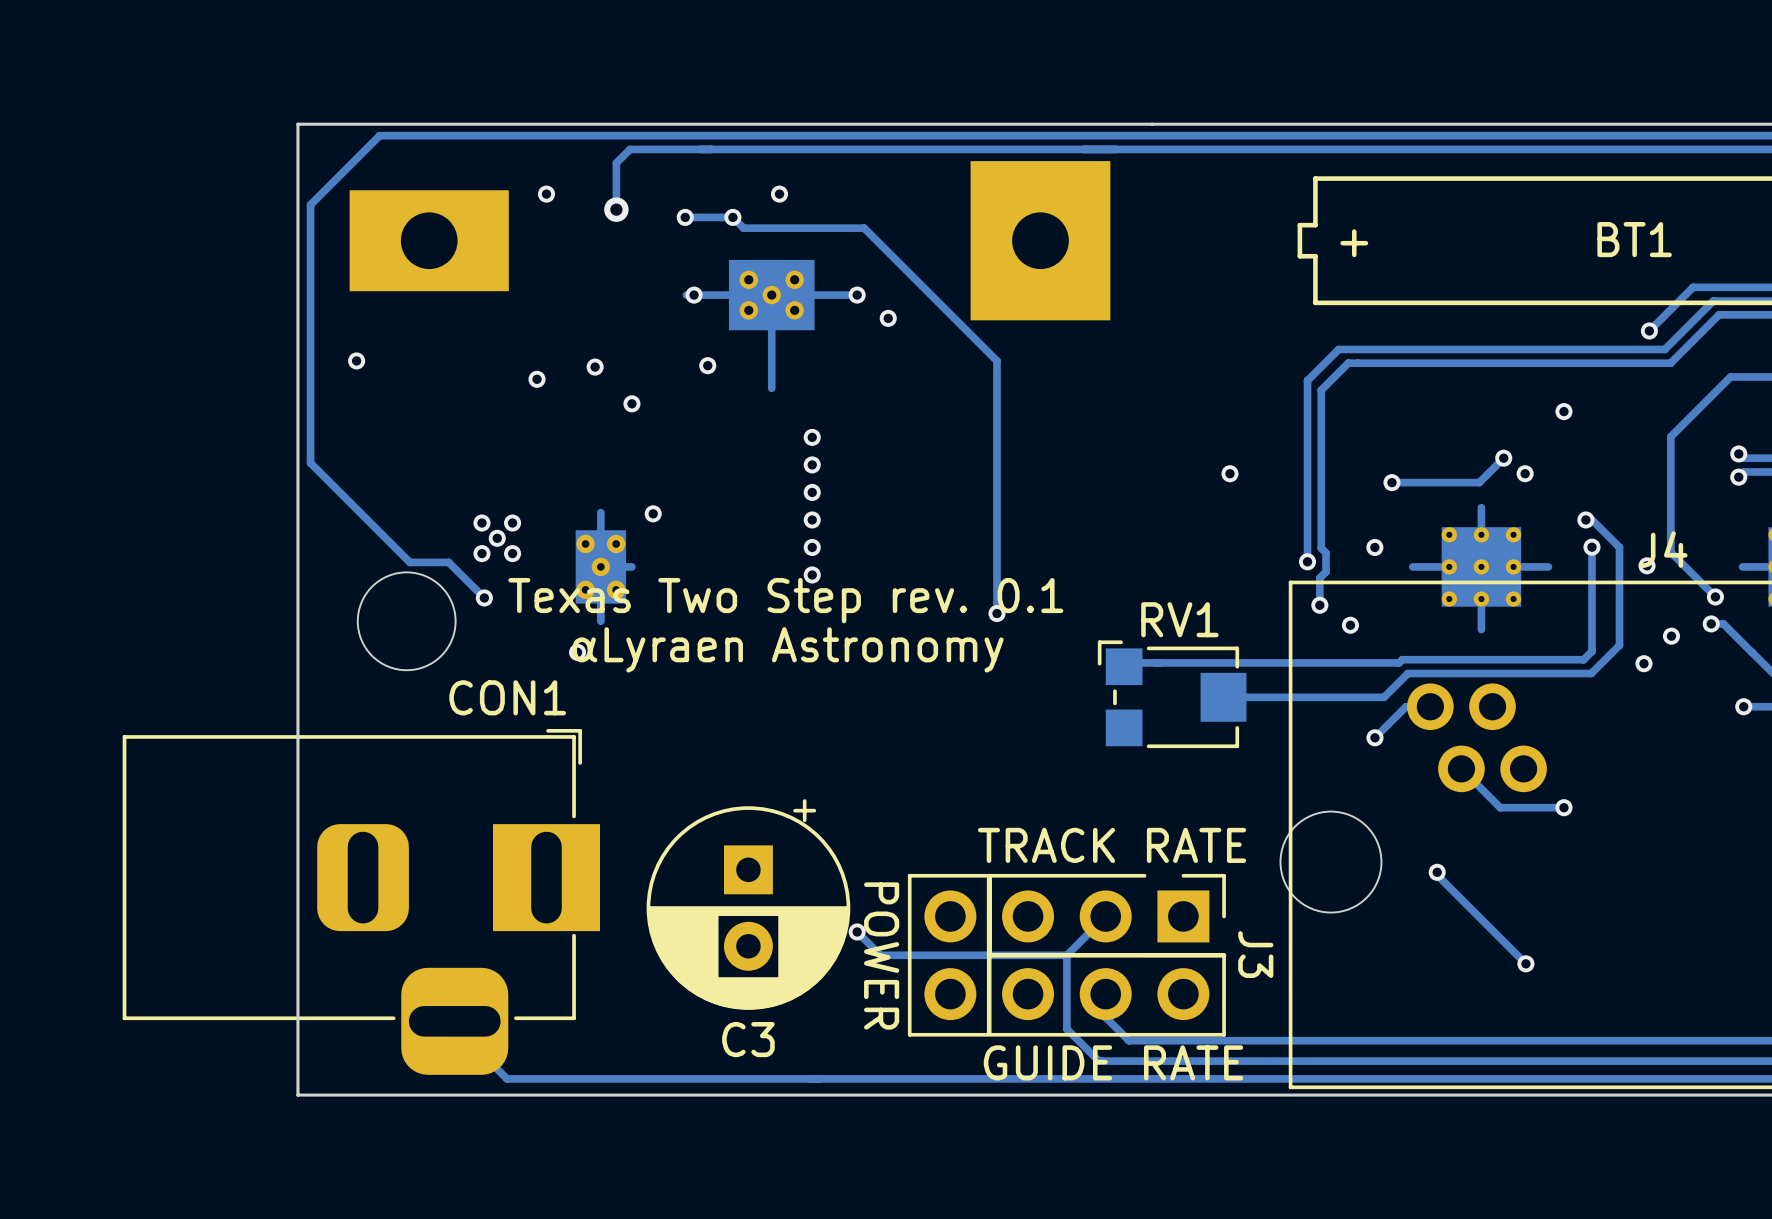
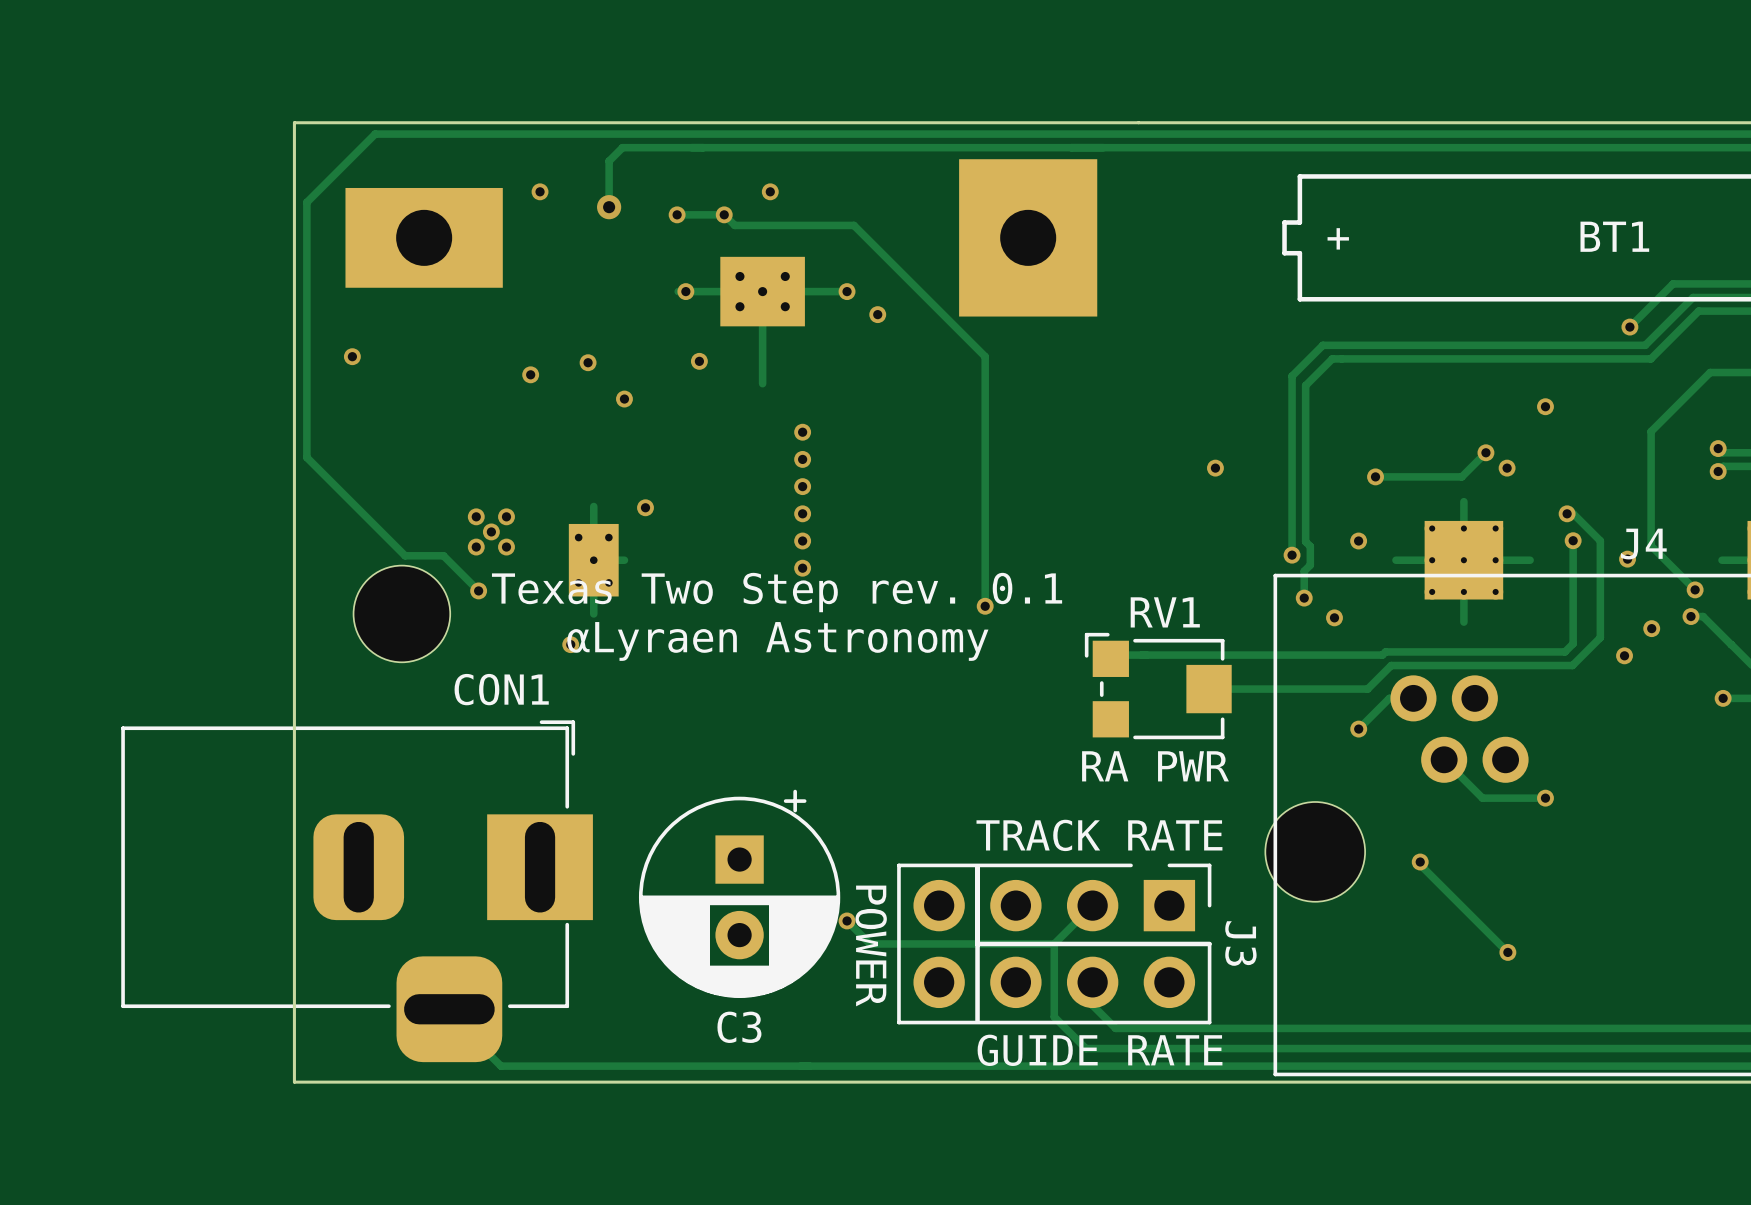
text: none -> RA PWR (1155, 766)

